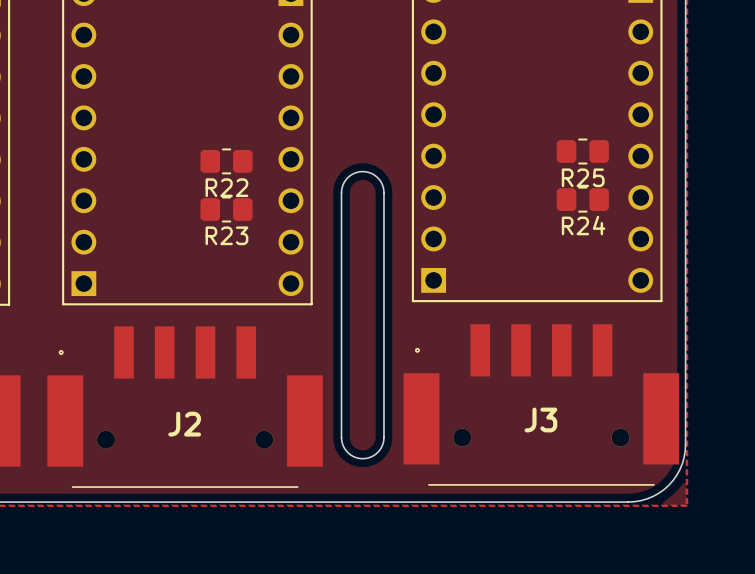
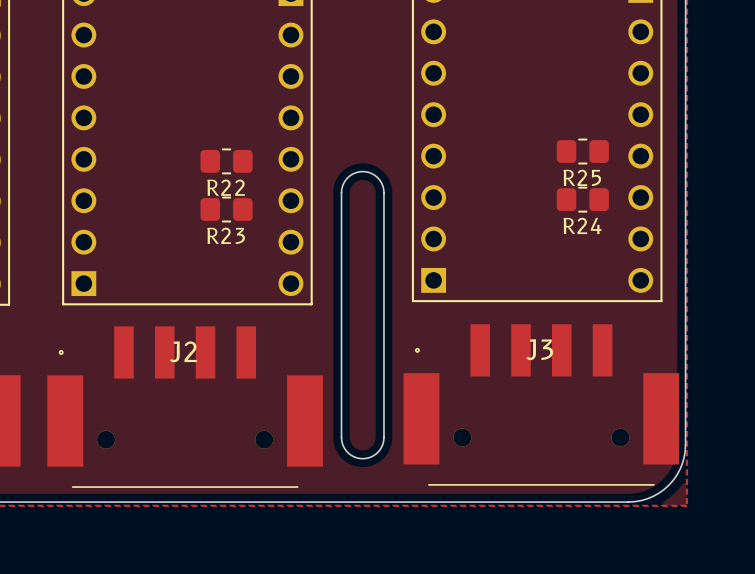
J3 name position: J3 (540, 420) -> J3 (539, 349)
J2 name position: J2 (184, 424) -> J2 (183, 351)

